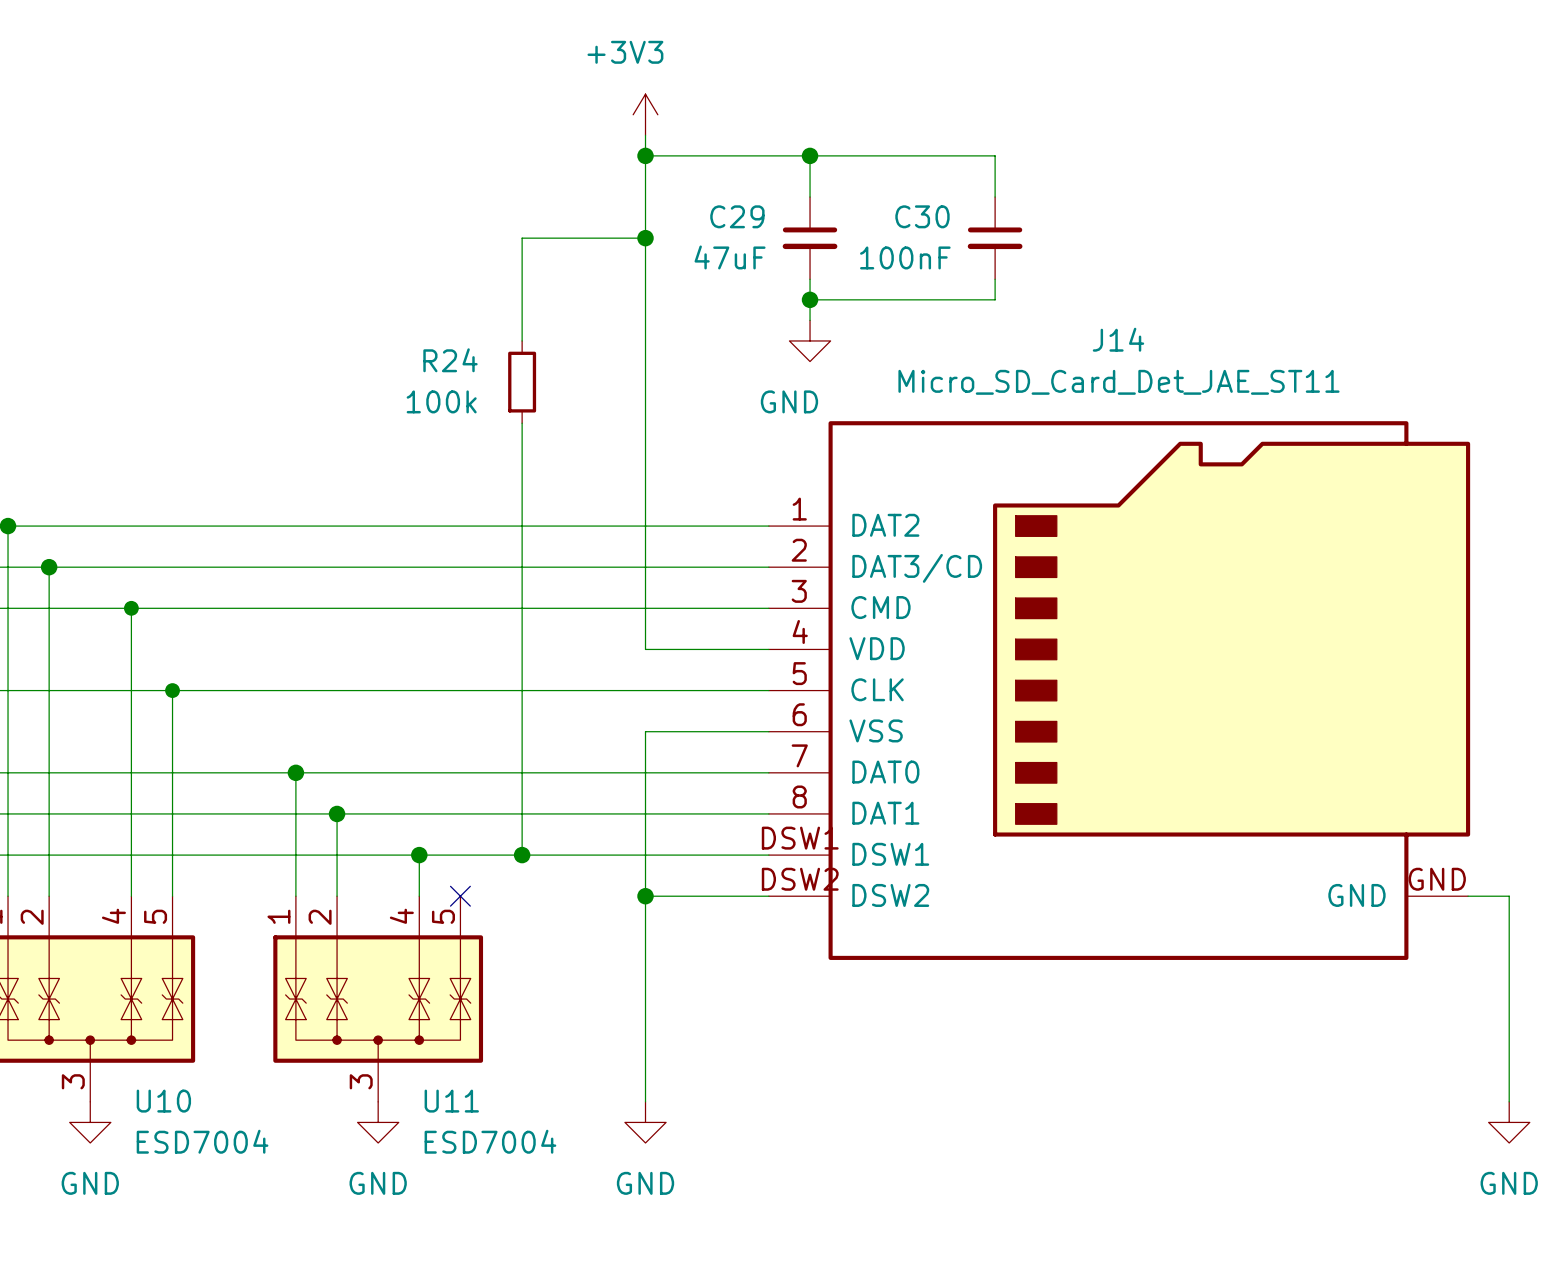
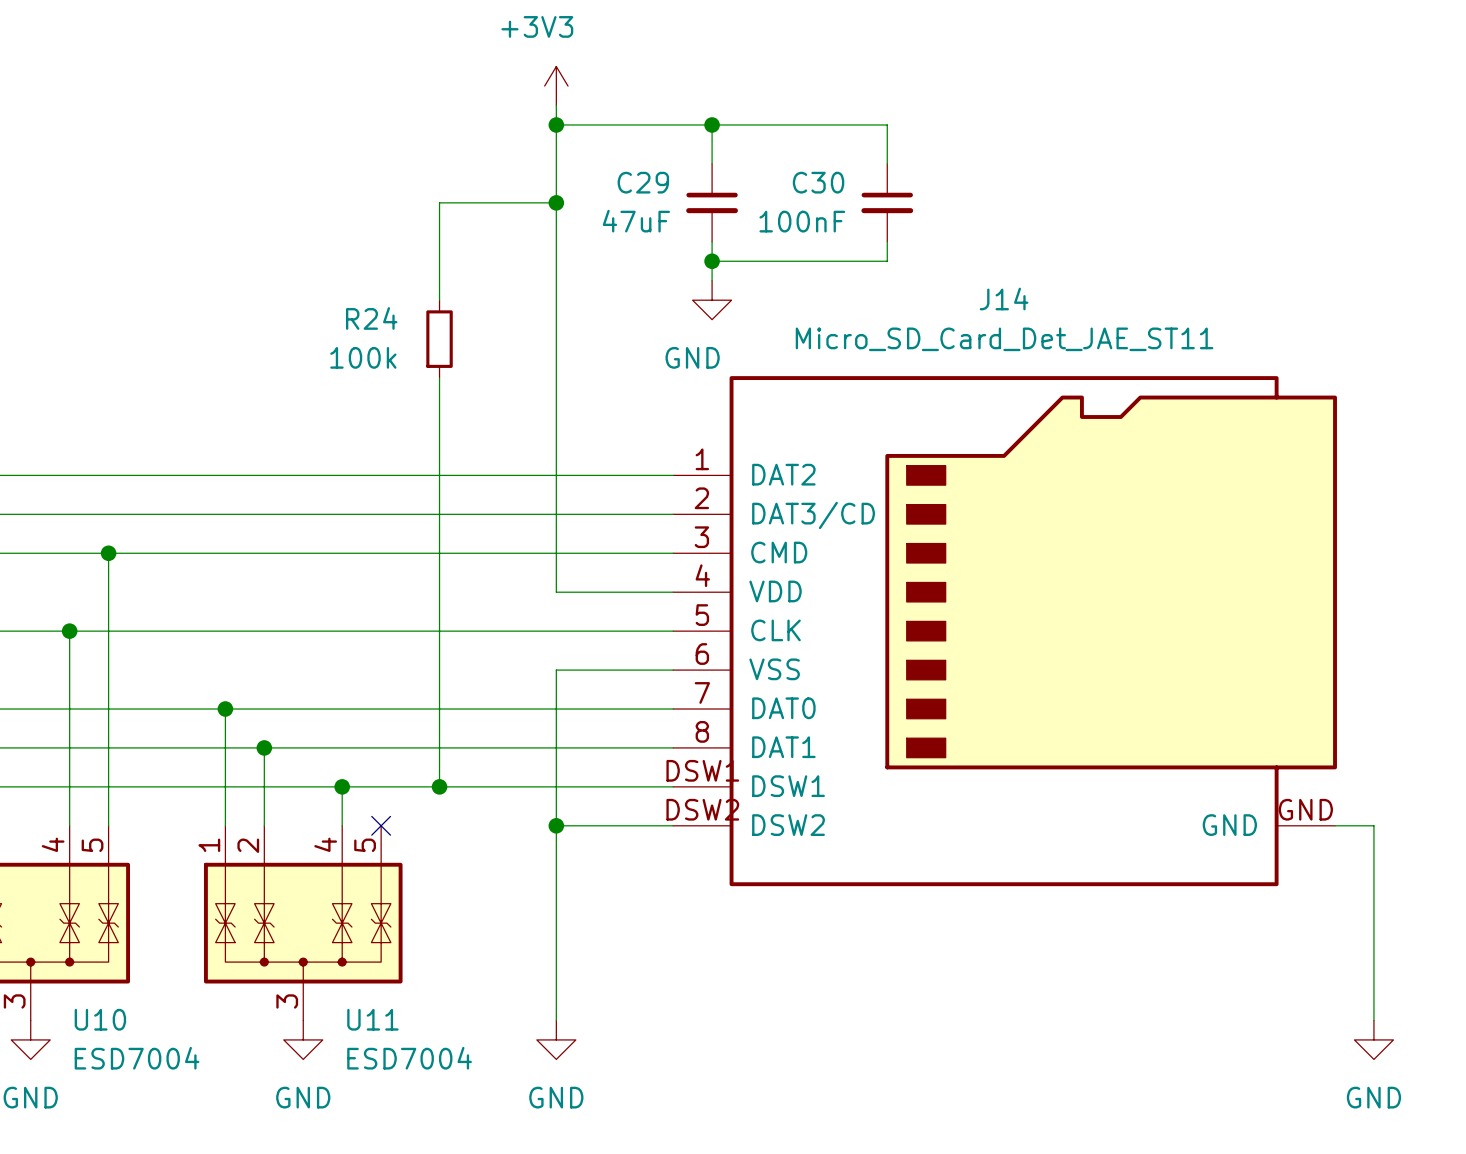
wire: (131, 608) (131, 690) -> (108, 553) (108, 631)
junction: (131, 608) -> none
junction: none -> (108, 553)
junction: none -> (69, 631)
junction: (172, 690) -> none

